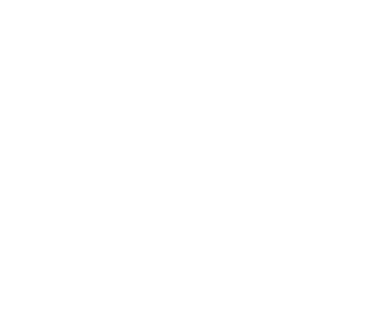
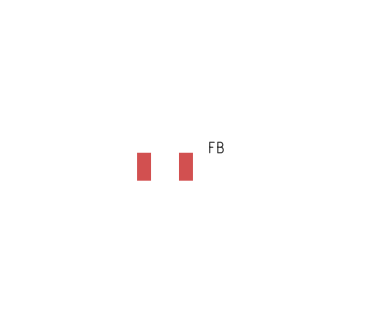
FB: none -> (165, 166)

